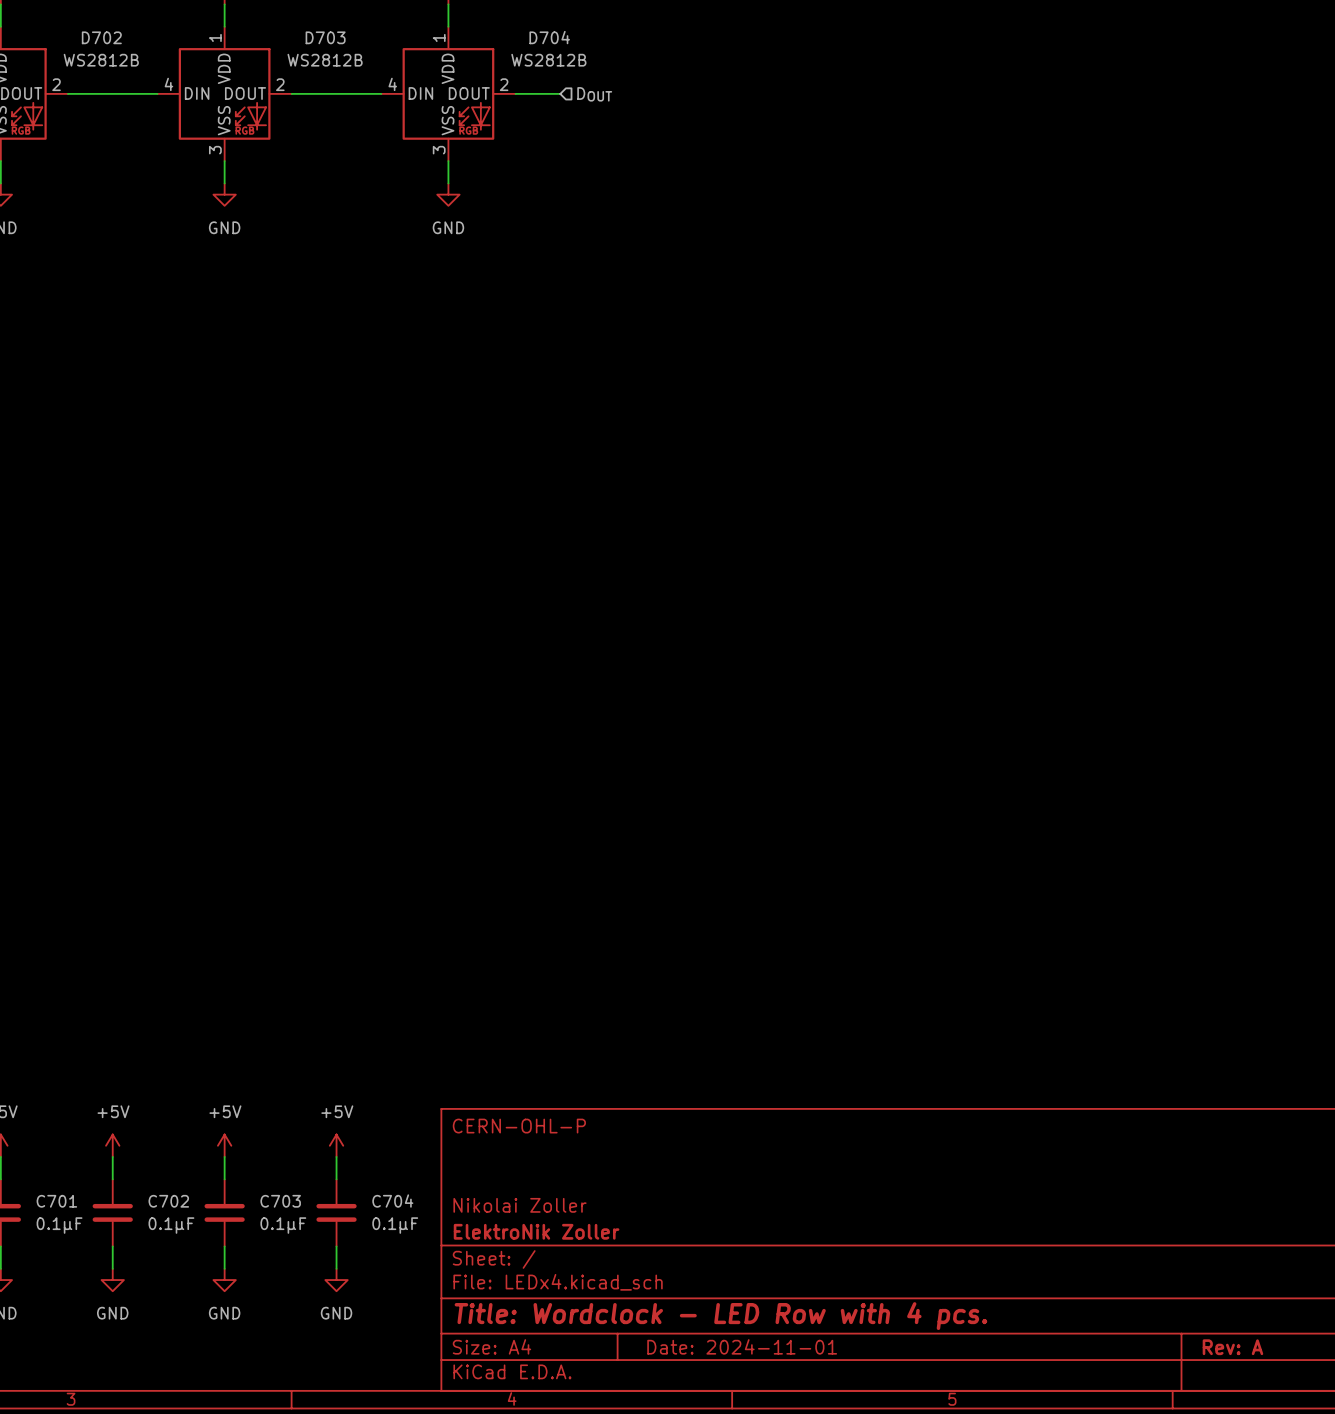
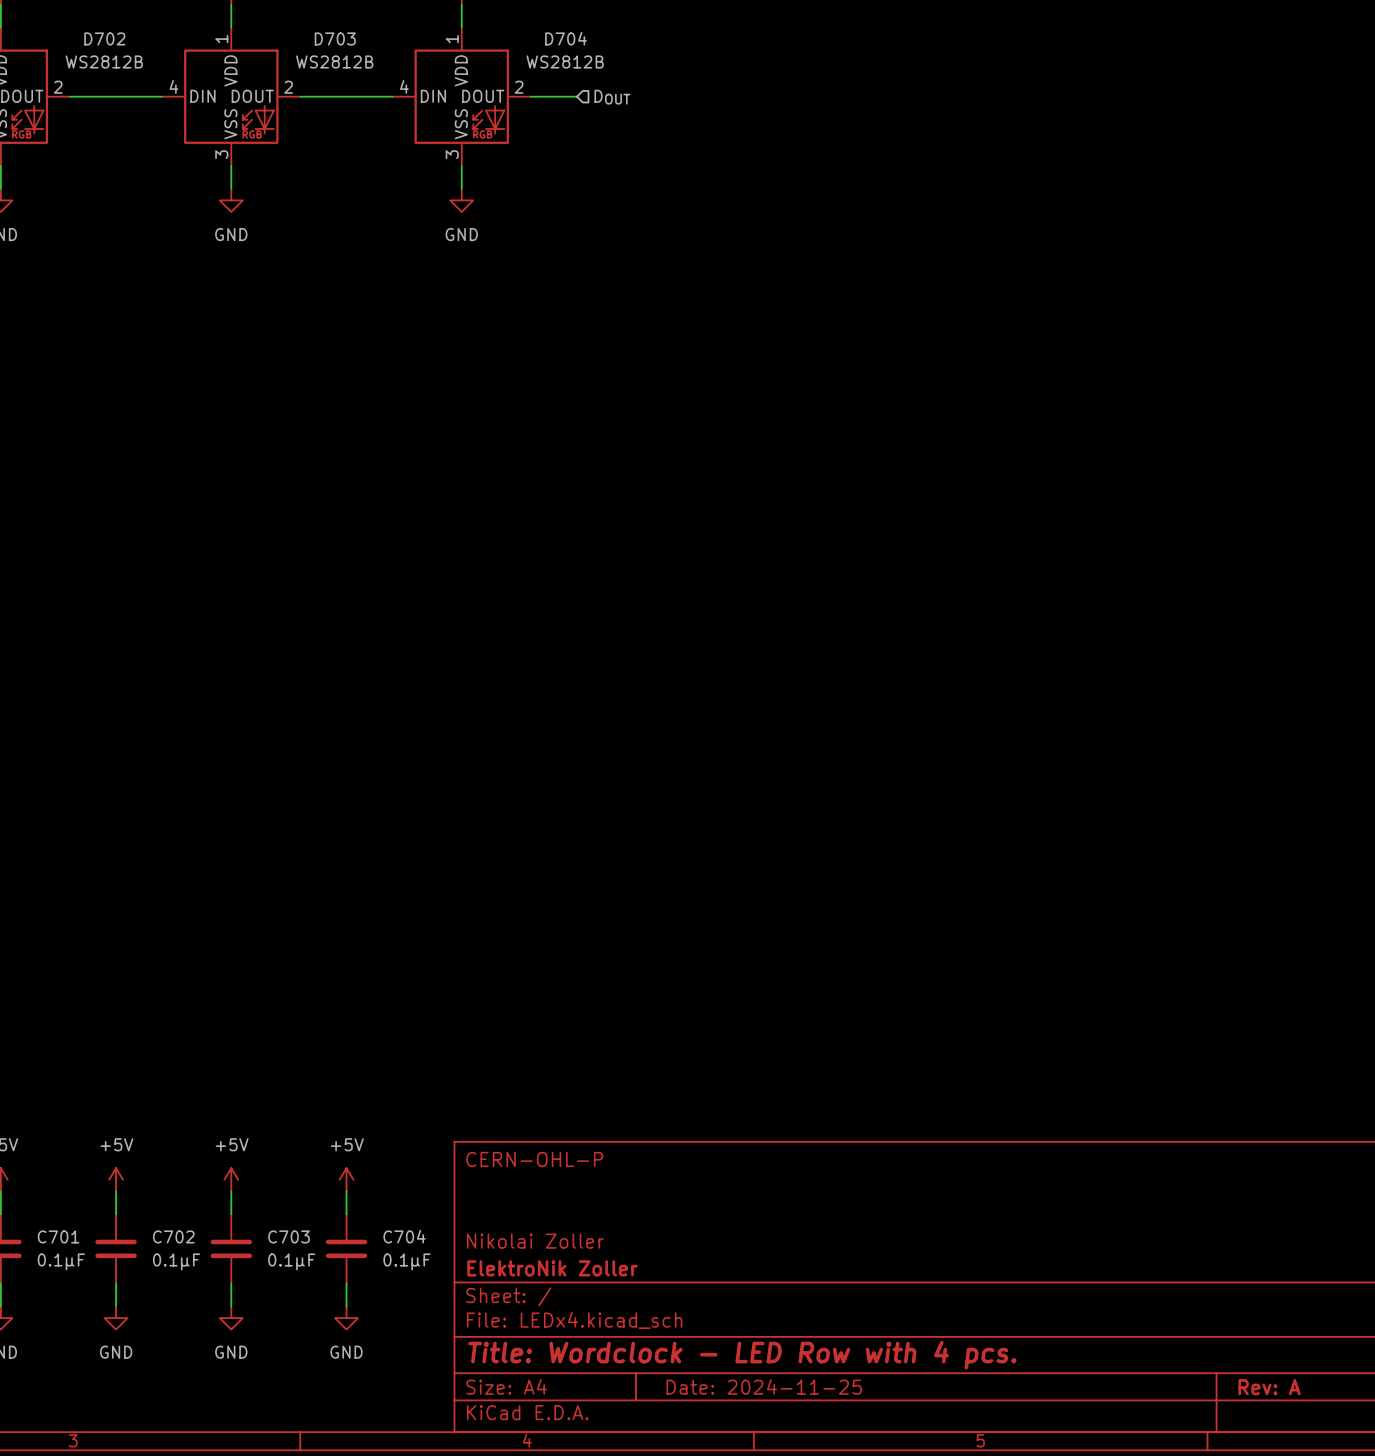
title block: Date: 2024-11-01 (742, 1346) -> Date: 2024-11-25 (764, 1386)

